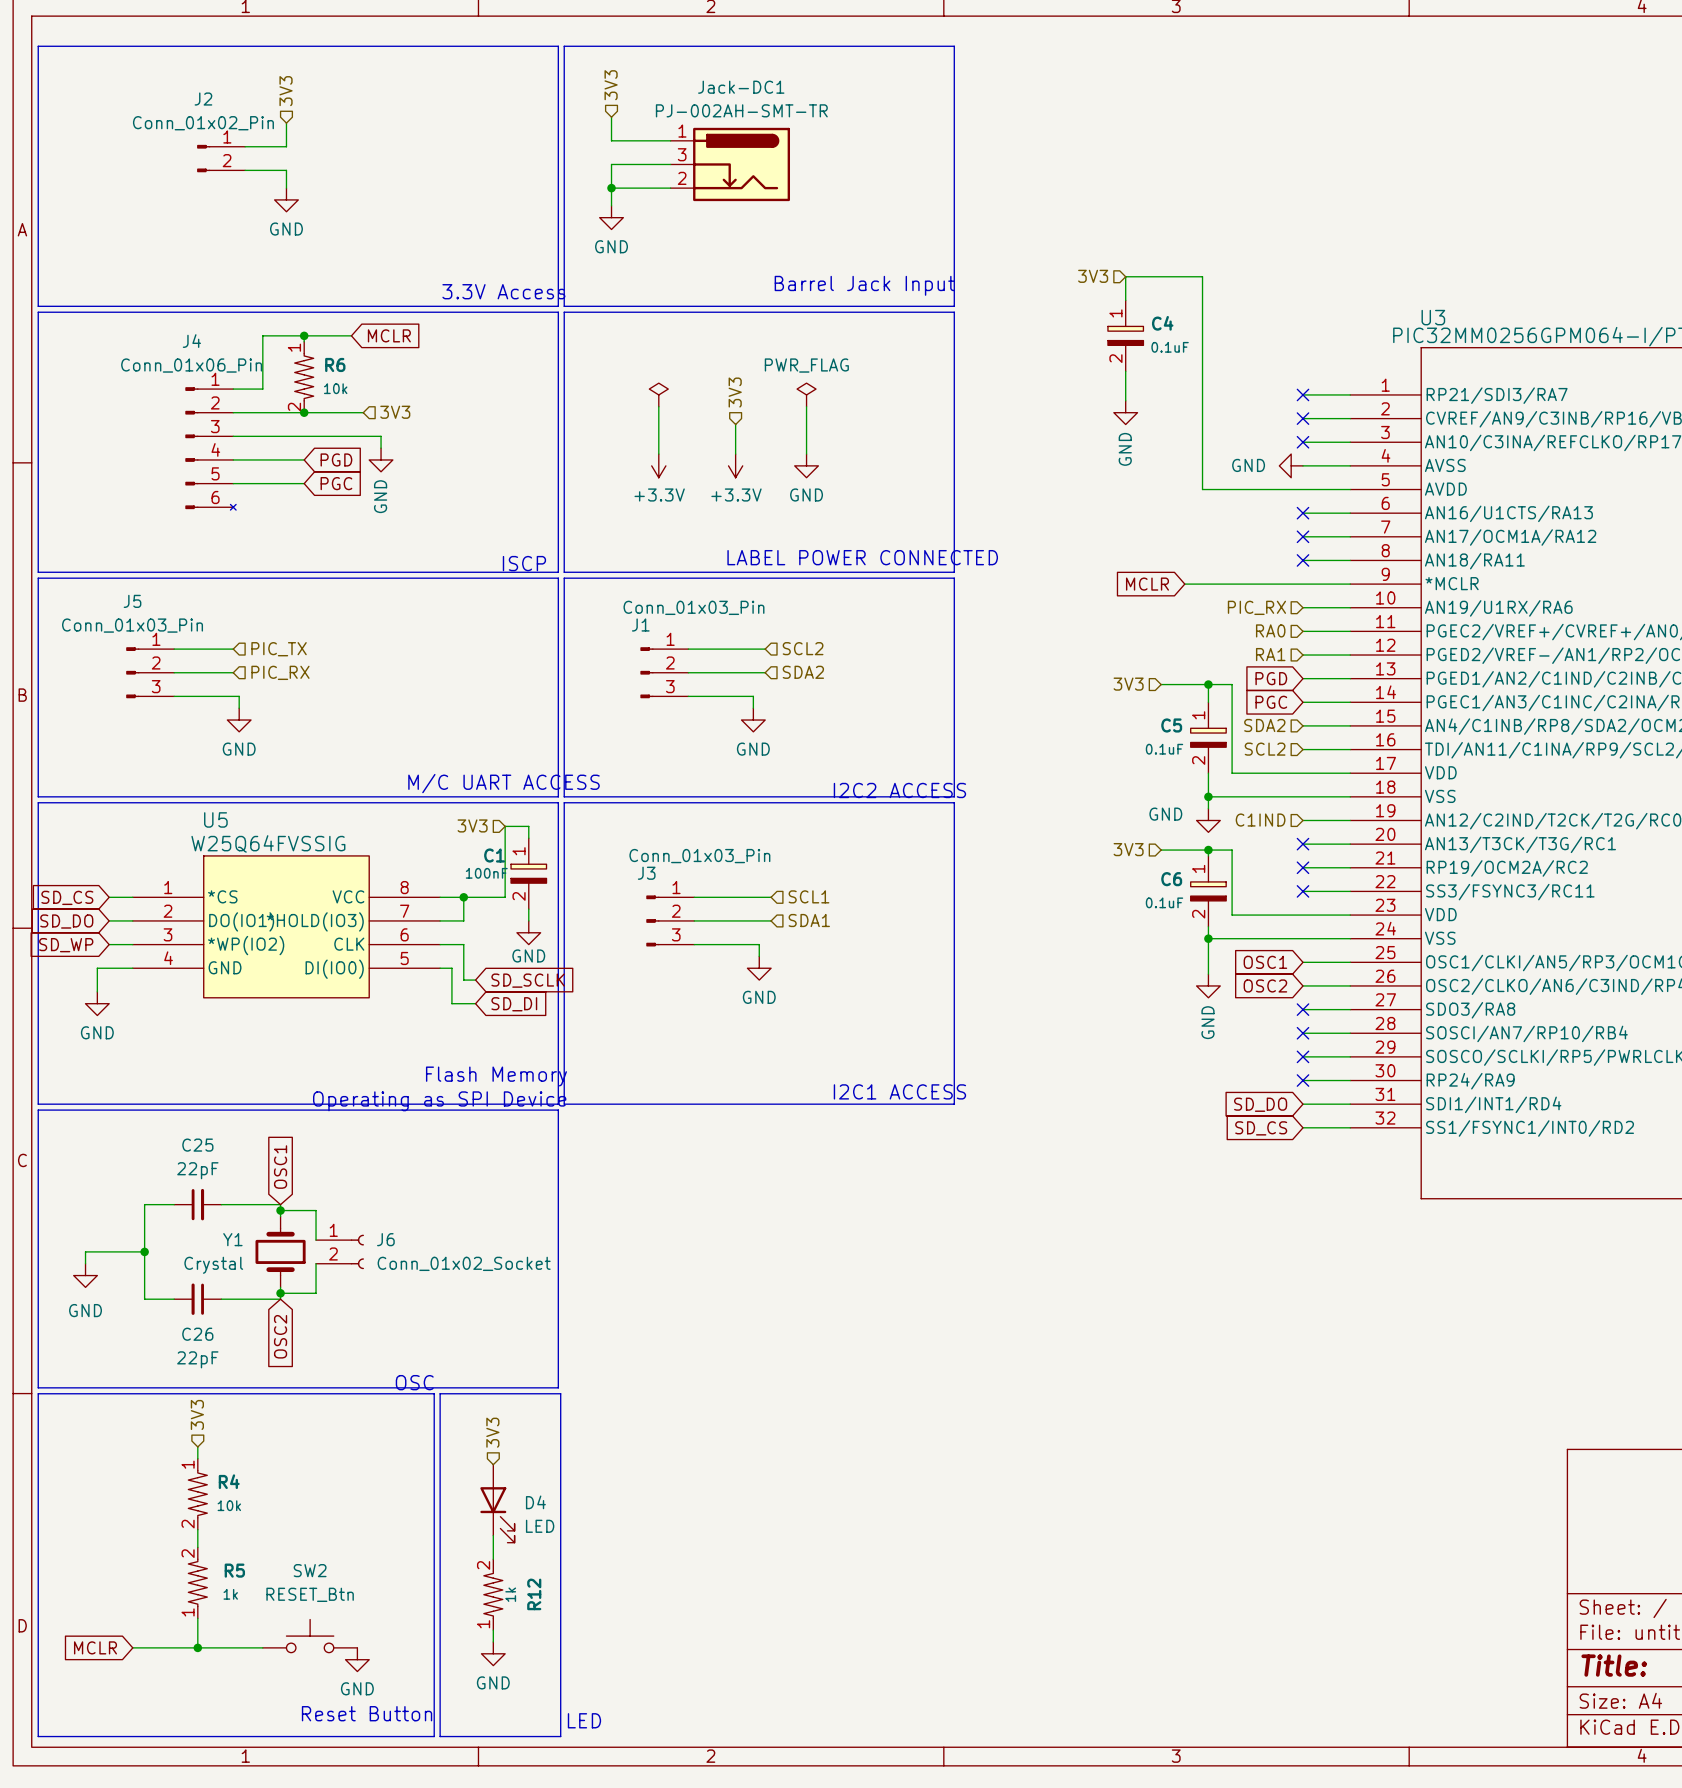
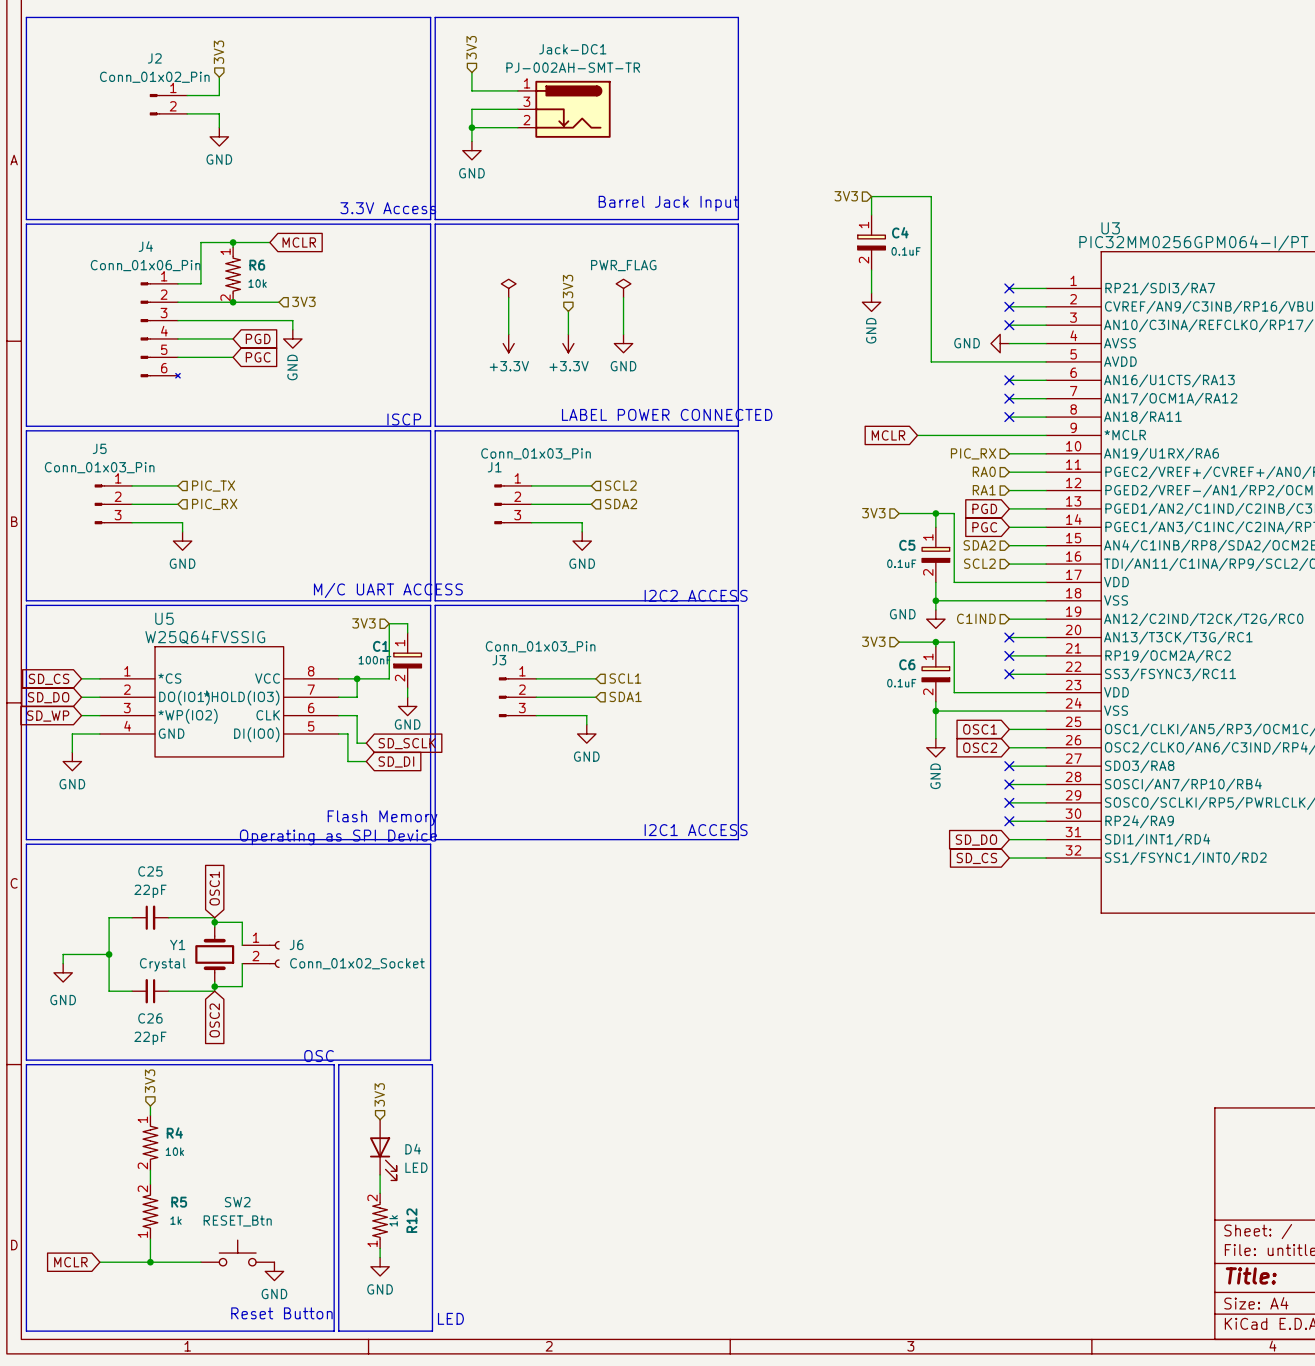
U5 symbol: [132, 855, 441, 998] -> [99, 646, 339, 757]

